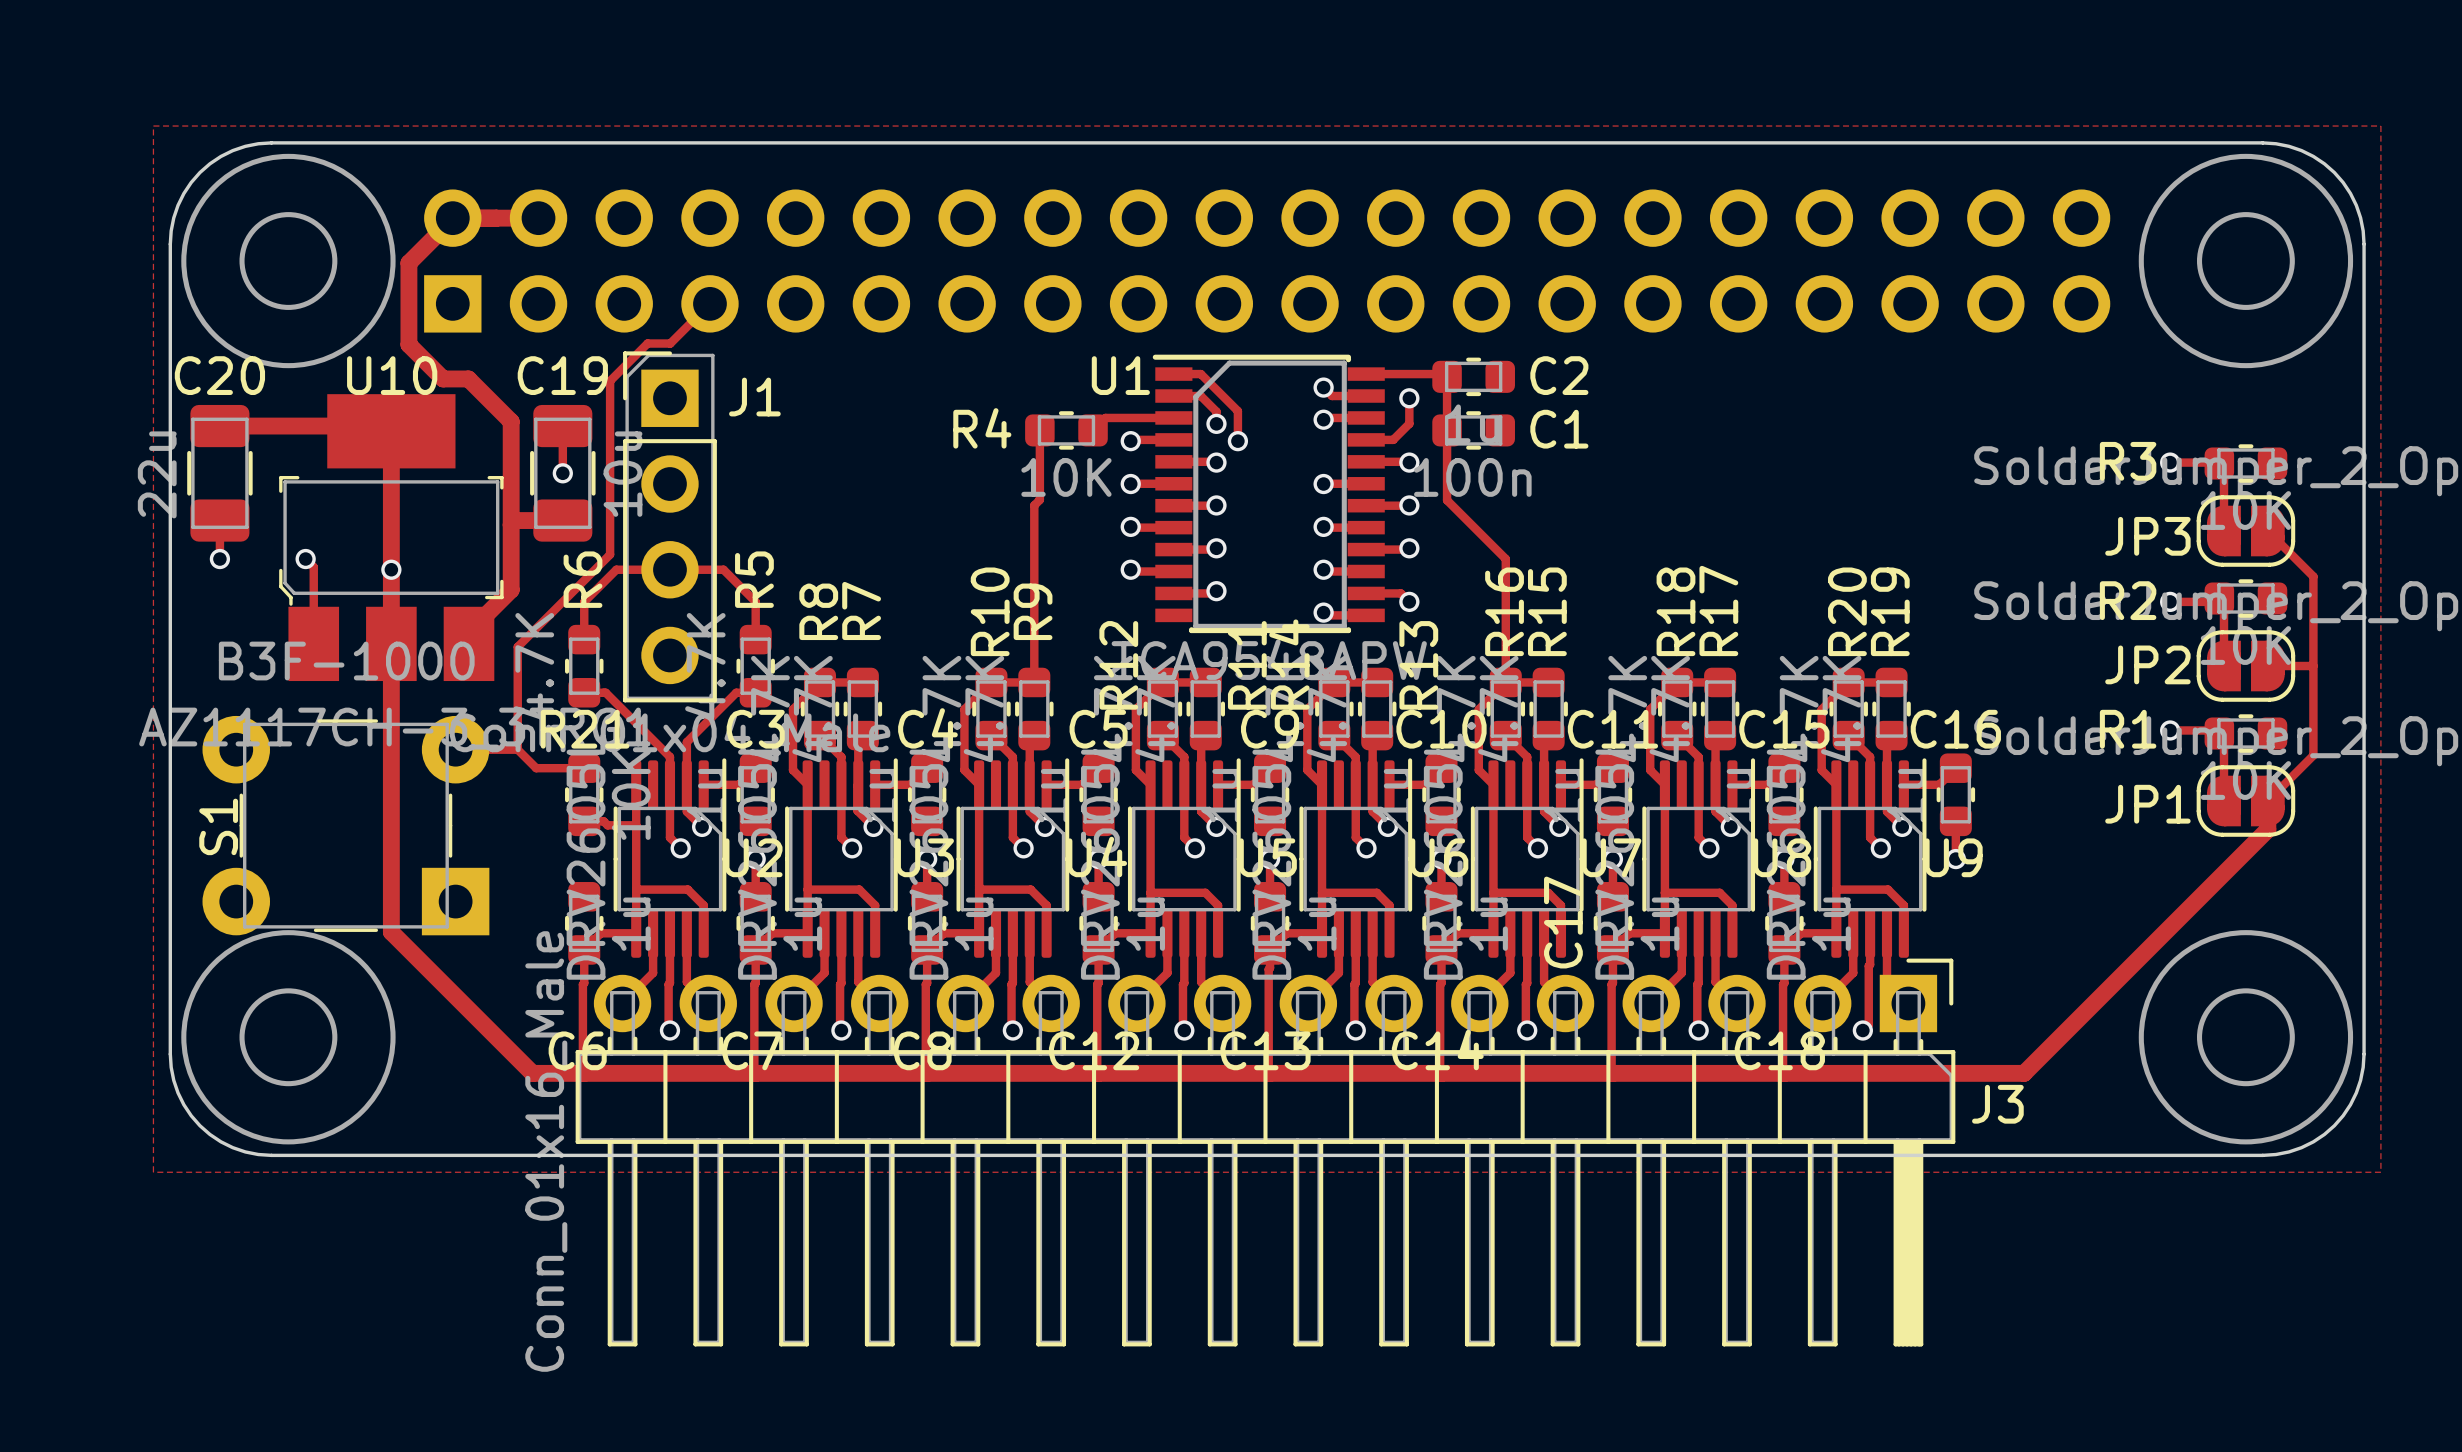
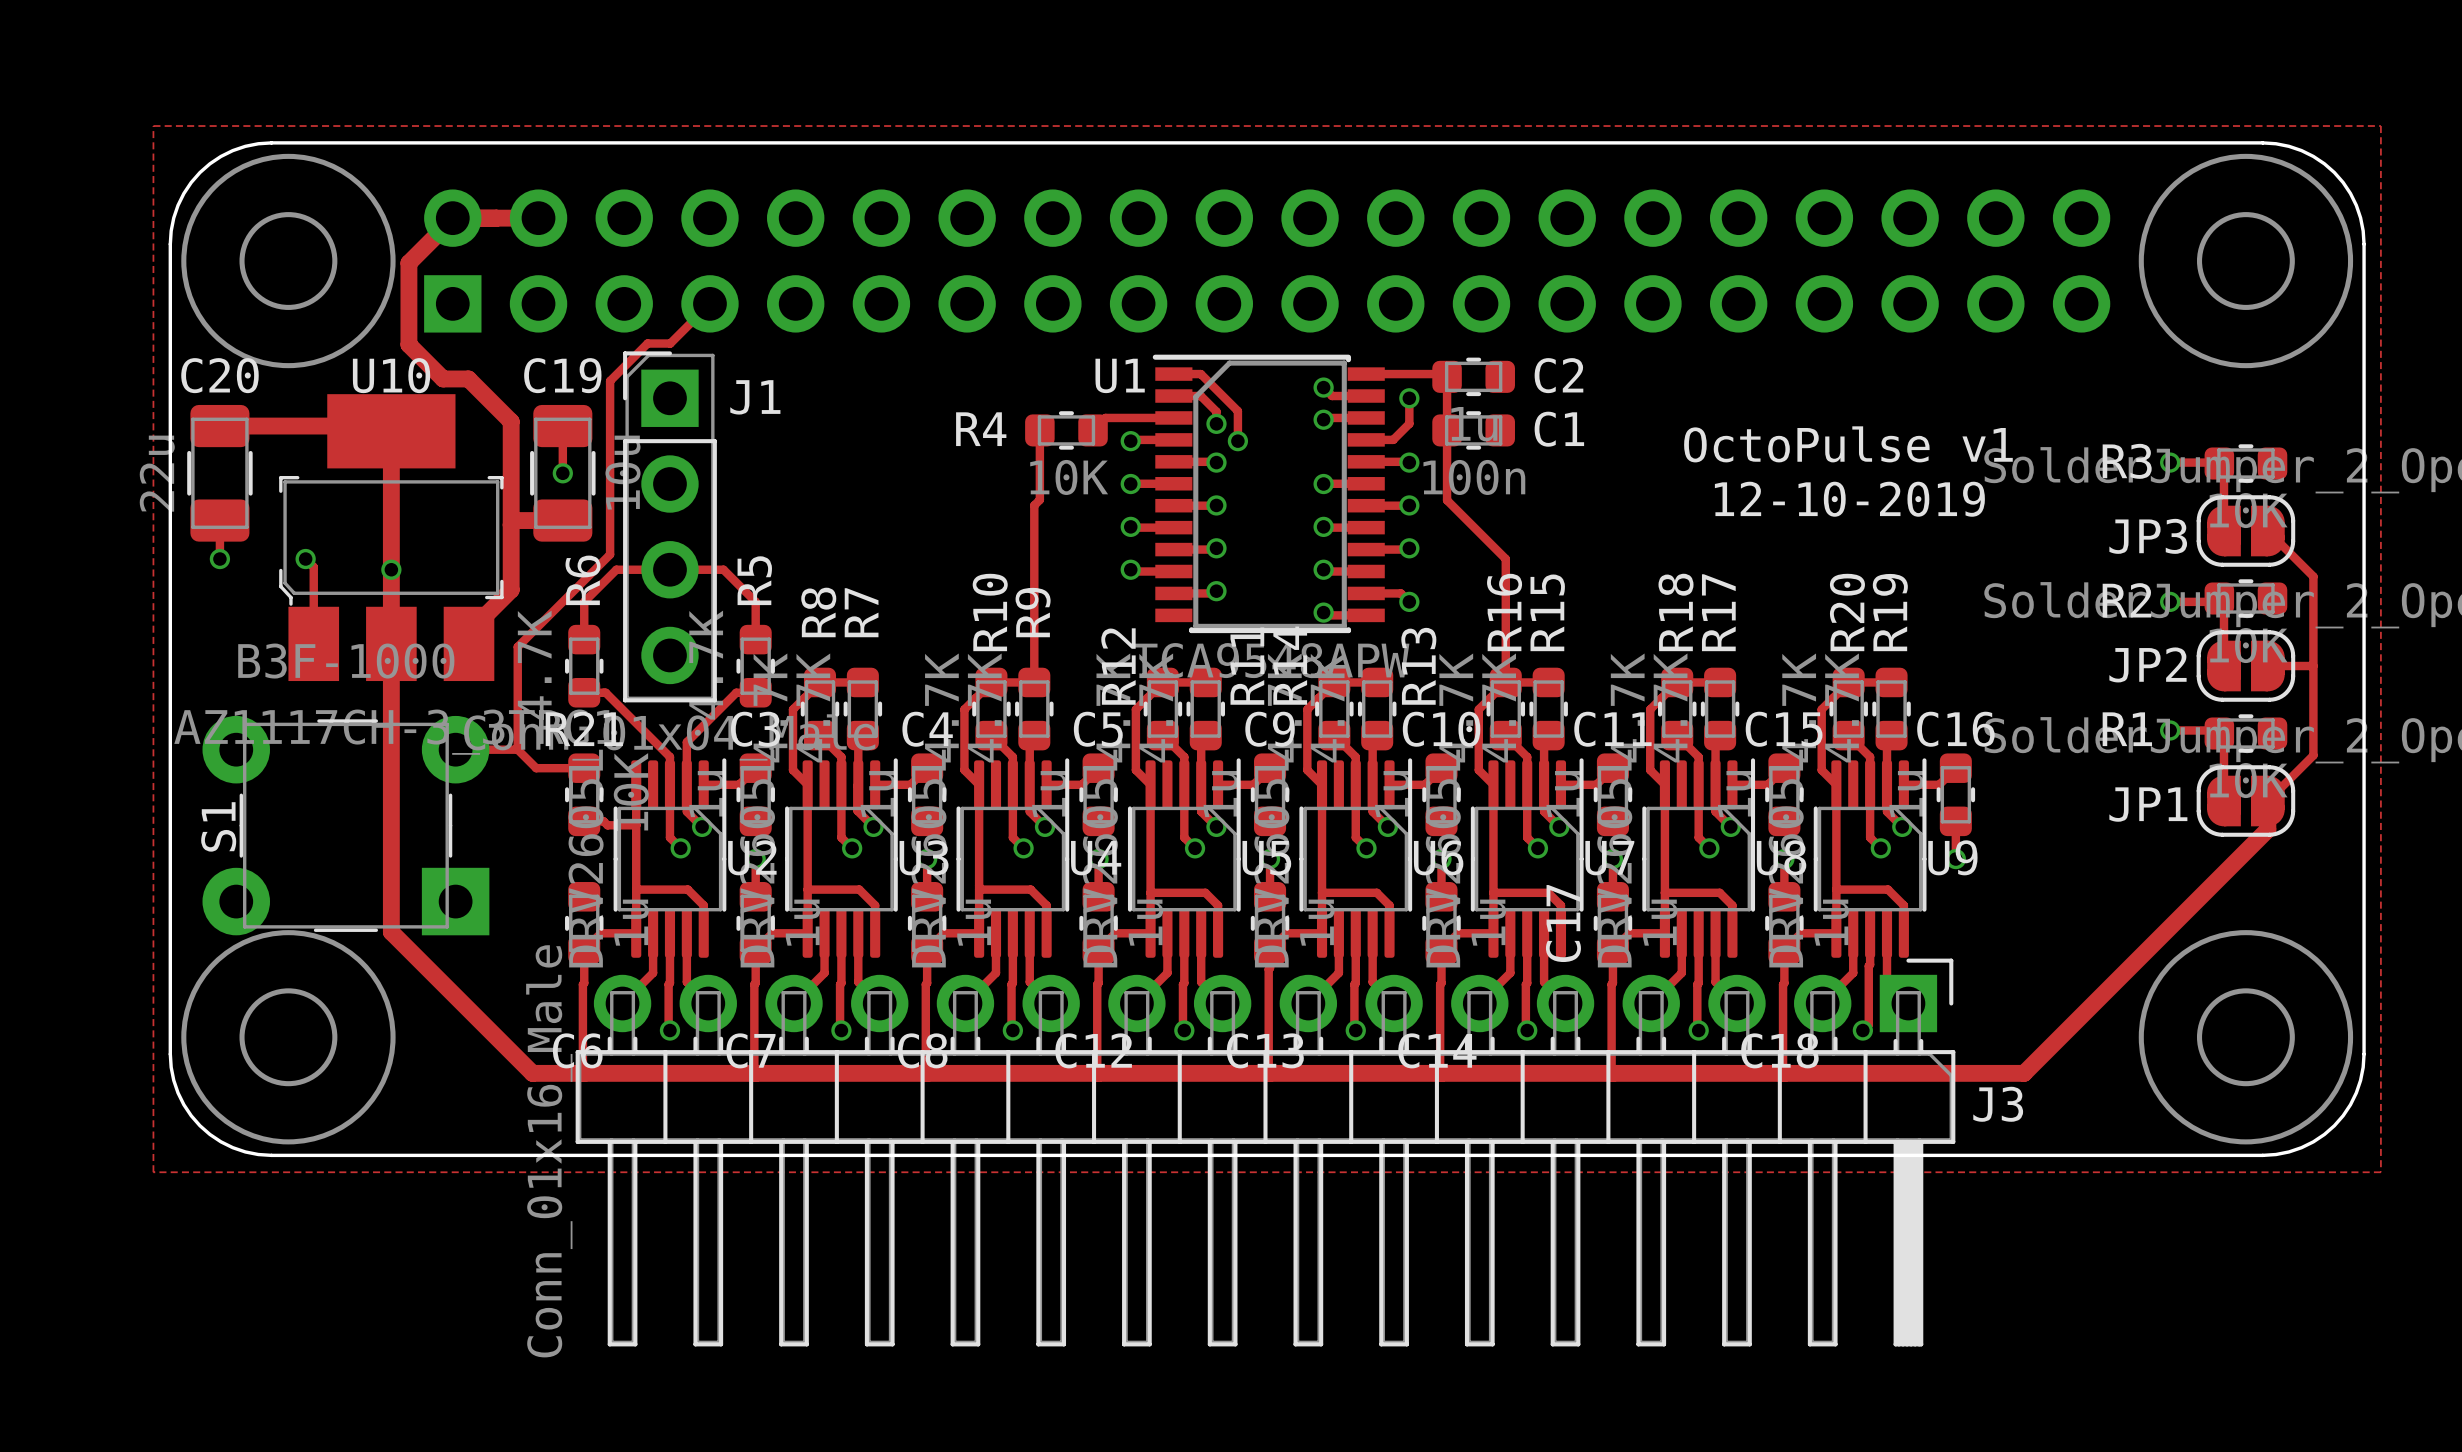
text: none -> OctoPulse v1 (1848, 444)
text: none -> 12-10-2019 (1849, 499)

